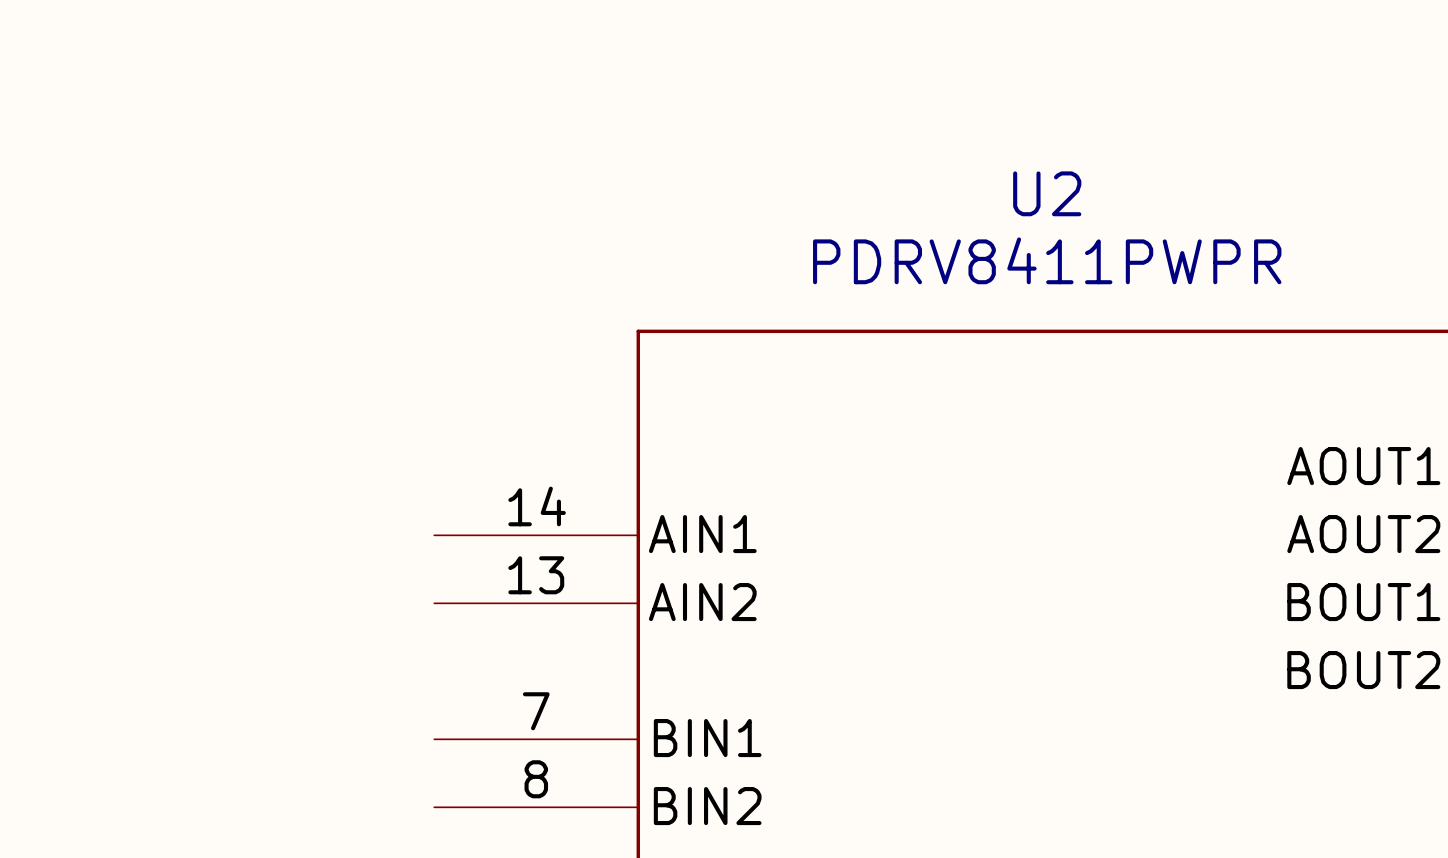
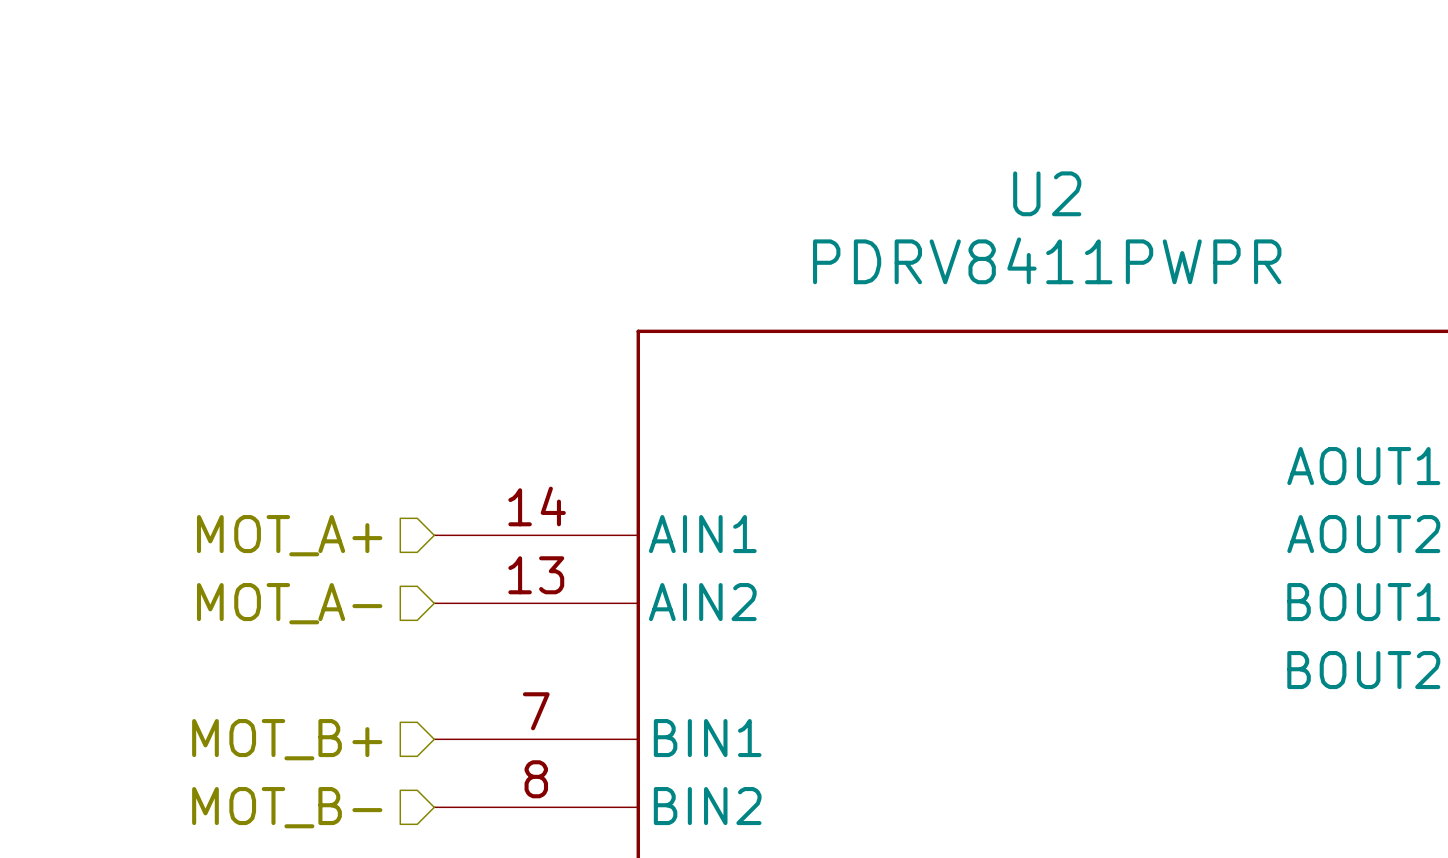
hierarchical label: none -> MOT_A+ (289, 535)
hierarchical label: none -> MOT_A- (289, 603)
hierarchical label: none -> MOT_B+ (287, 739)
hierarchical label: none -> MOT_B- (287, 807)

